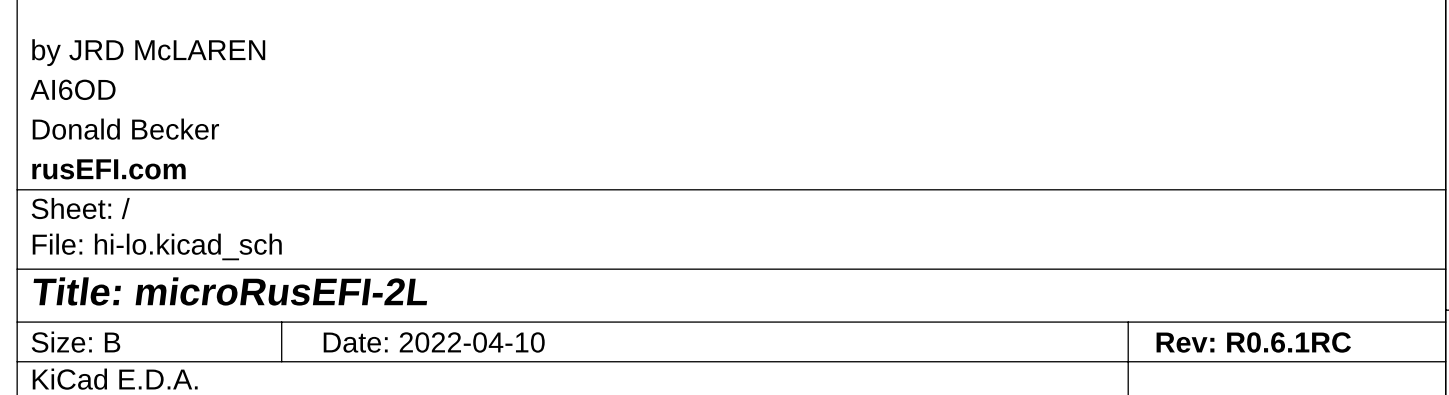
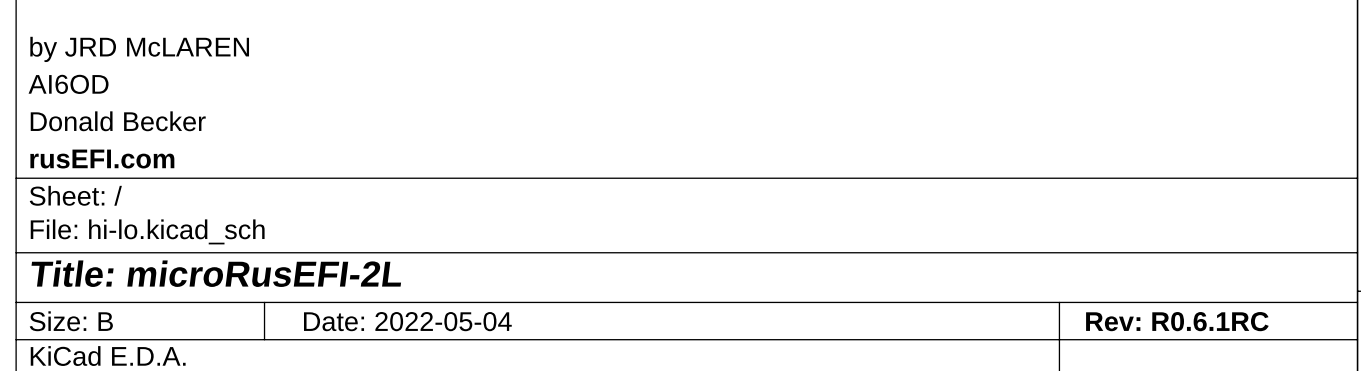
title block: Date: 2022-04-10 (434, 342) -> Date: 2022-05-04 (407, 321)

